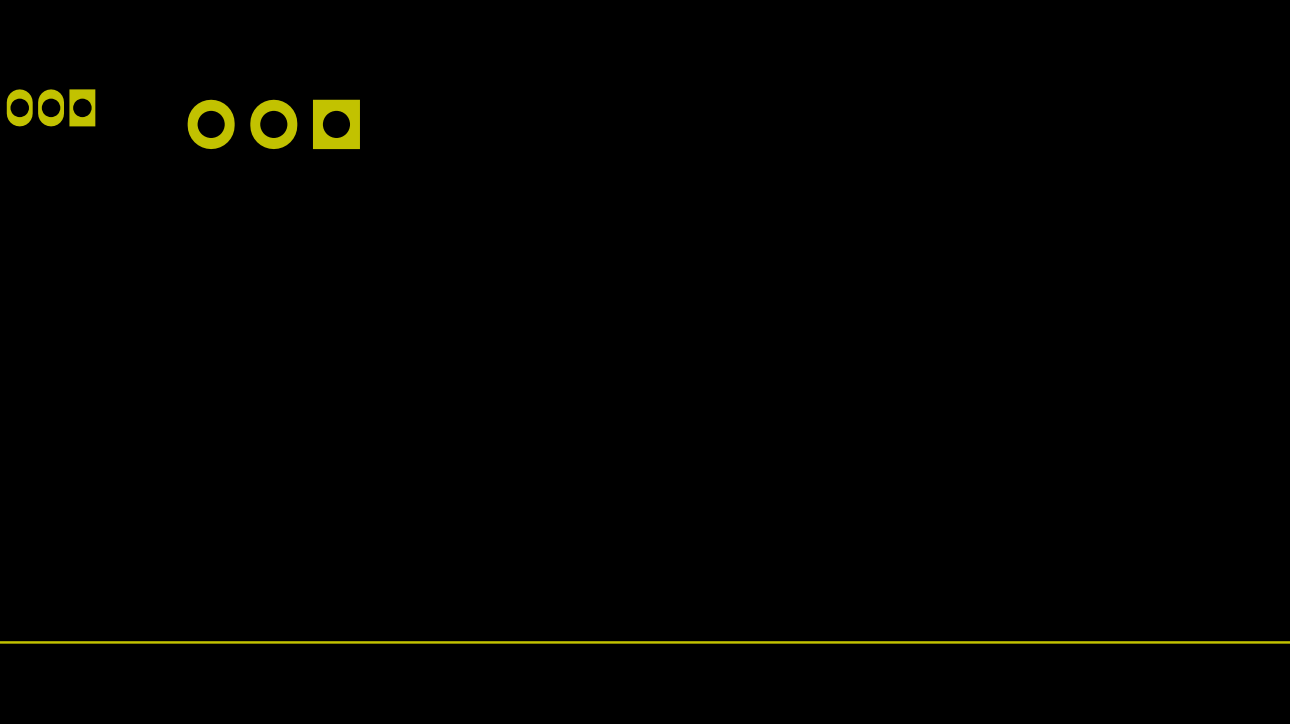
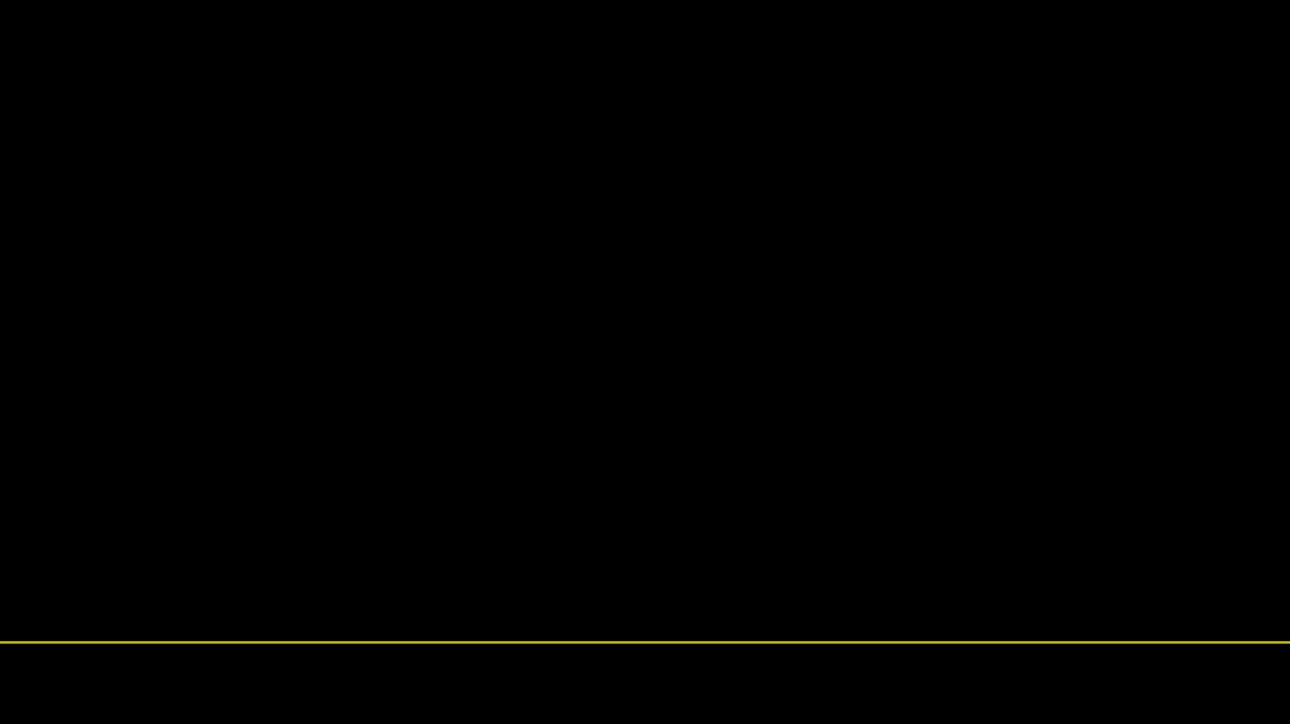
part: (51, 107) -> none
part: (273, 124) -> none

